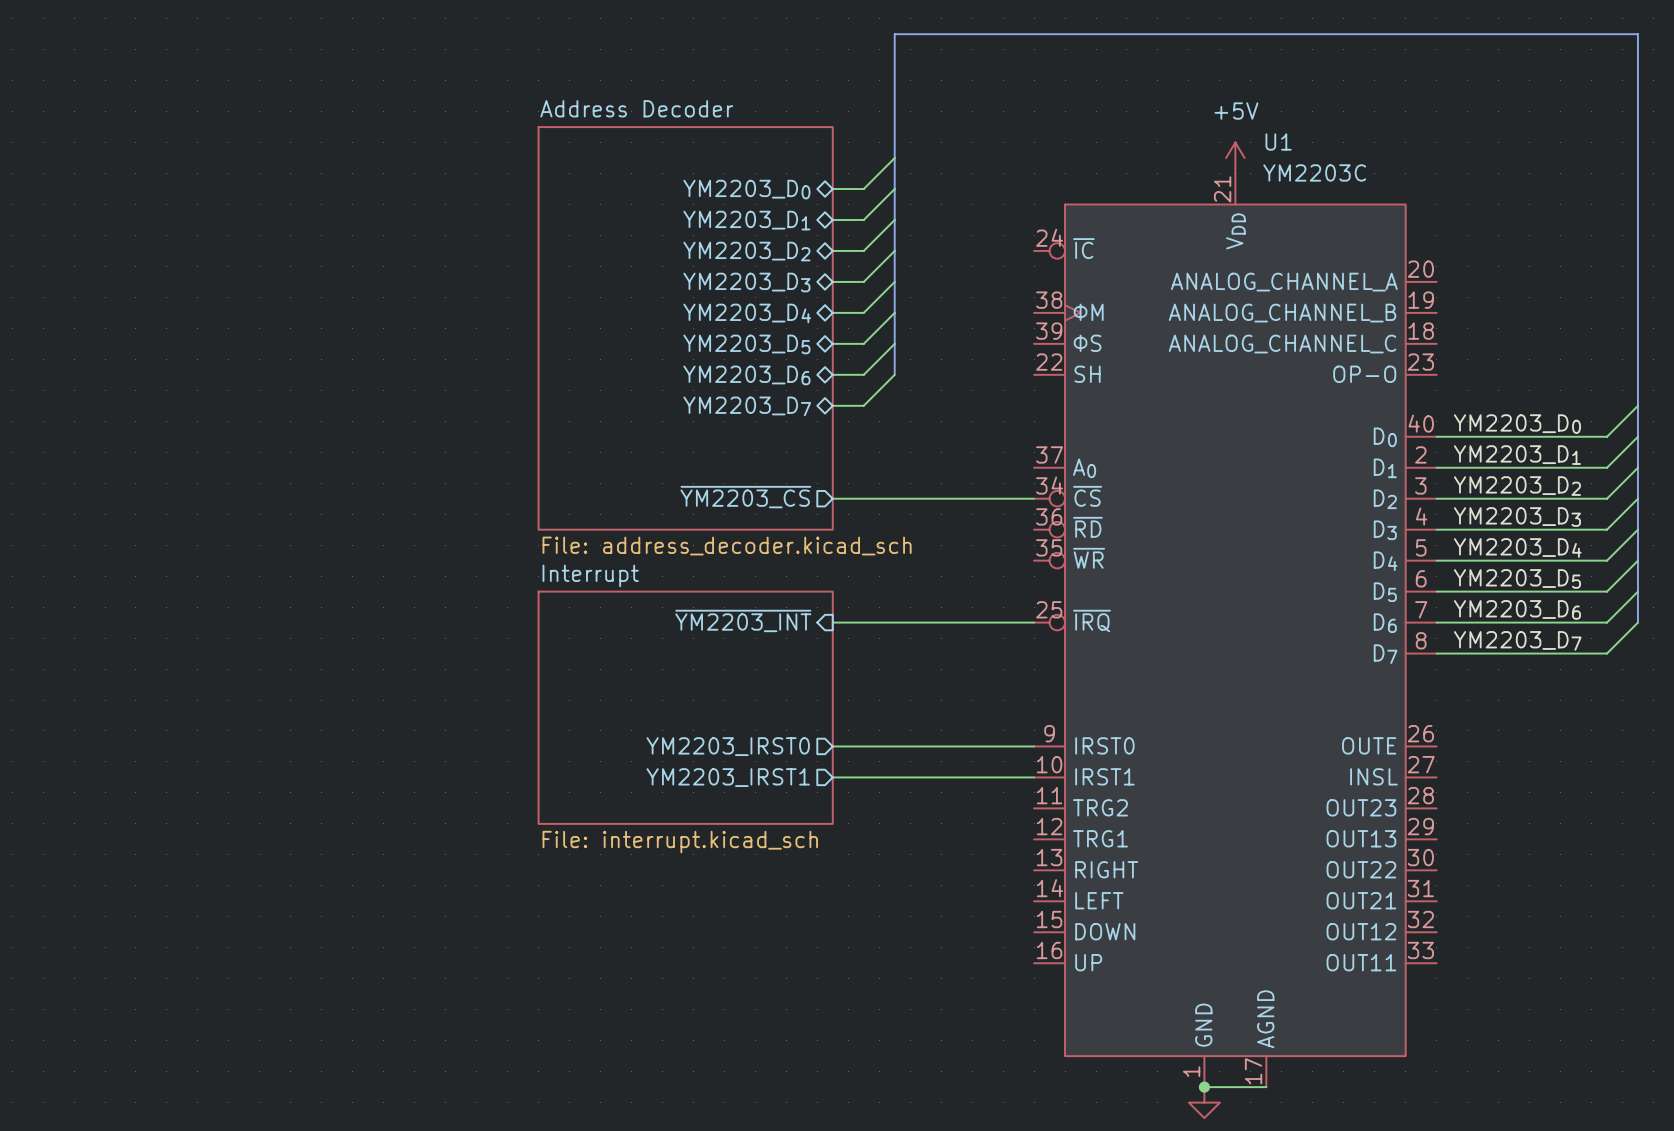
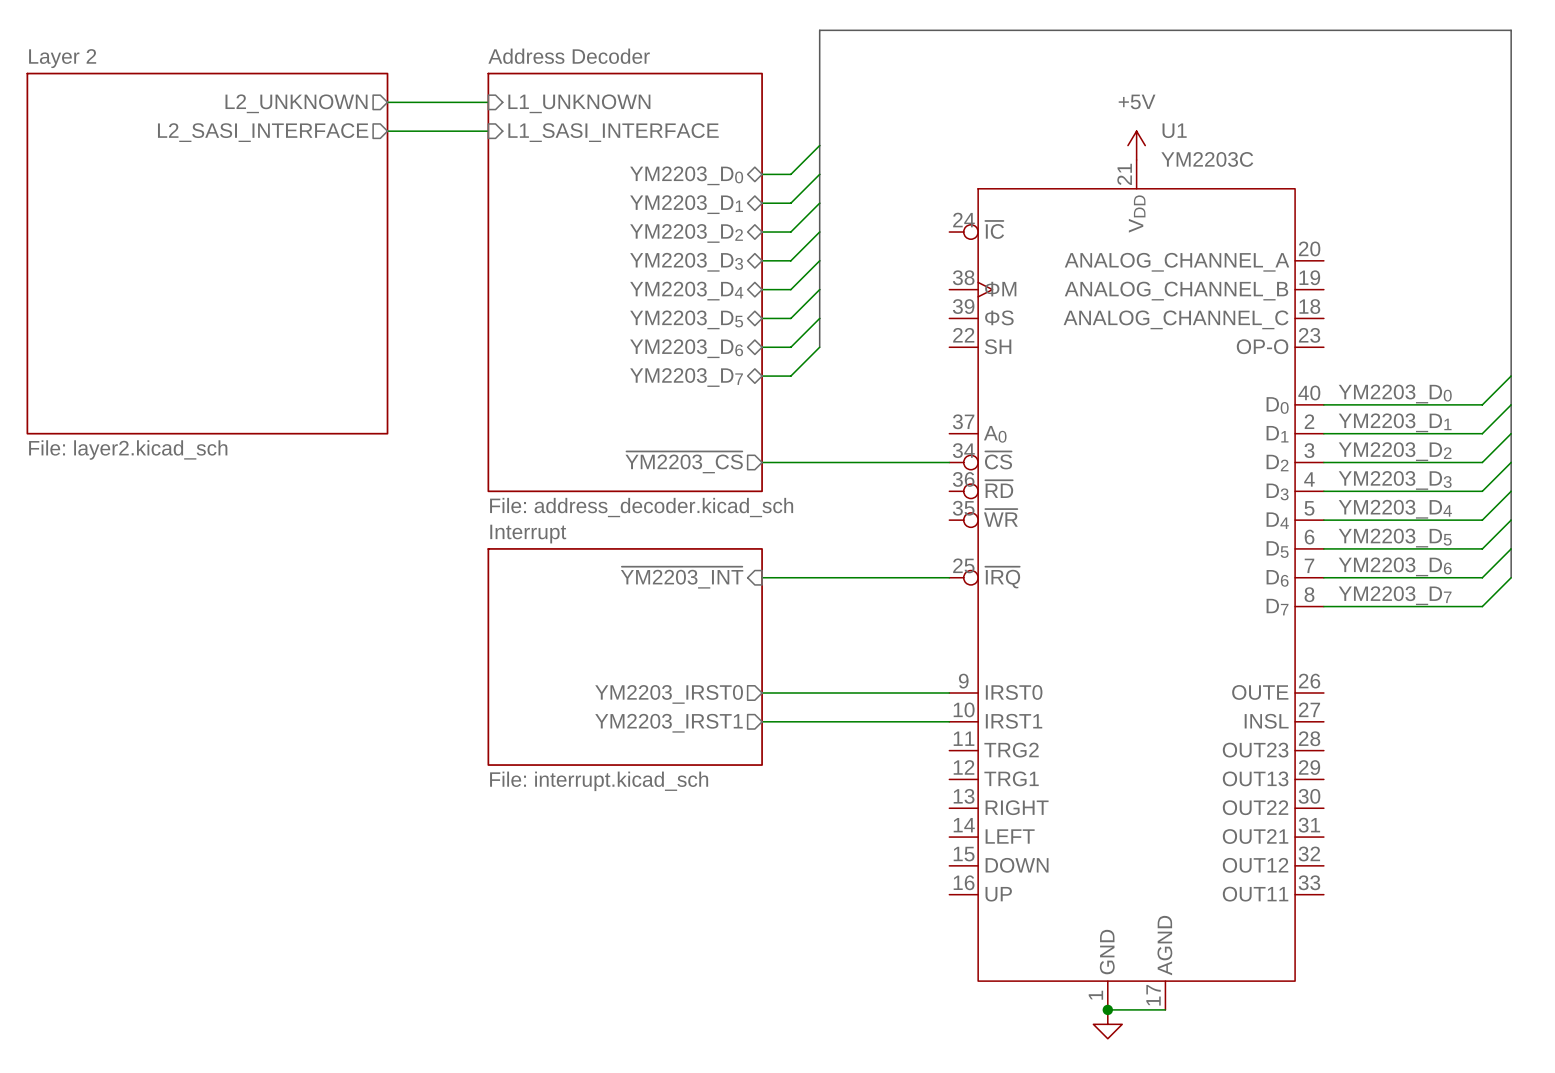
sheet pin: none -> L2_UNKNOWN (296, 103)
wire: none -> (387, 102) (488, 102)
sheet pin: none -> L1_UNKNOWN (579, 103)
sheet pin: none -> L2_SASI_INTERFACE (263, 132)
wire: none -> (387, 131) (488, 131)
sheet pin: none -> L1_SASI_INTERFACE (613, 132)
sheet Layer 2: none -> File: layer2.kicad_sch (207, 253)
sheet Address Decoder: none -> File: address_decoder.kicad_sch (625, 282)
sheet Address Decoder: File: address_decoder.kicad_sch (685, 328) -> none

